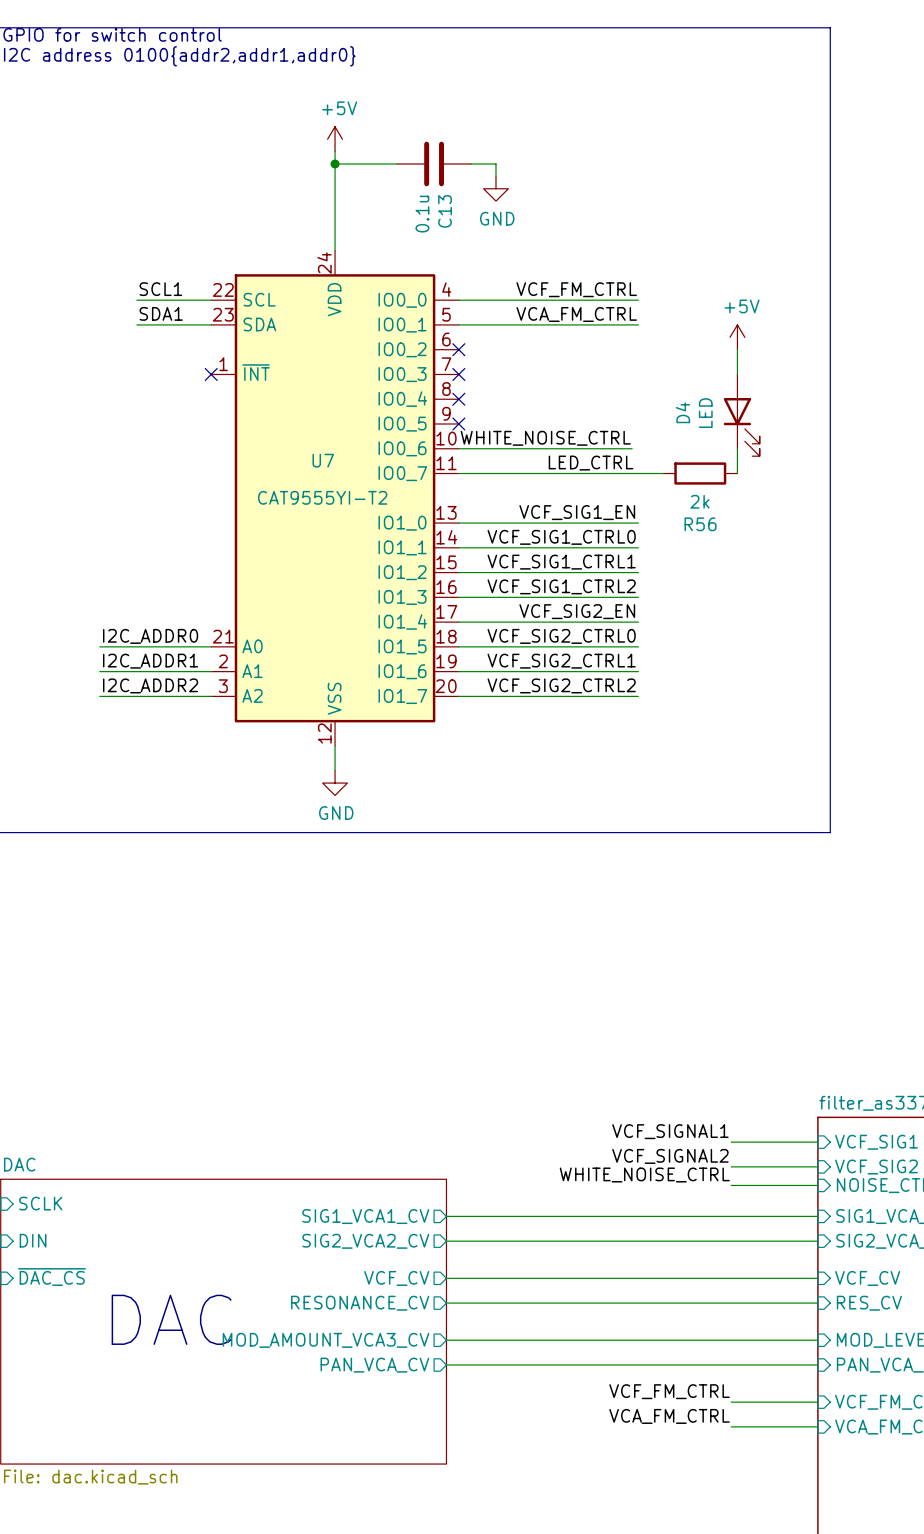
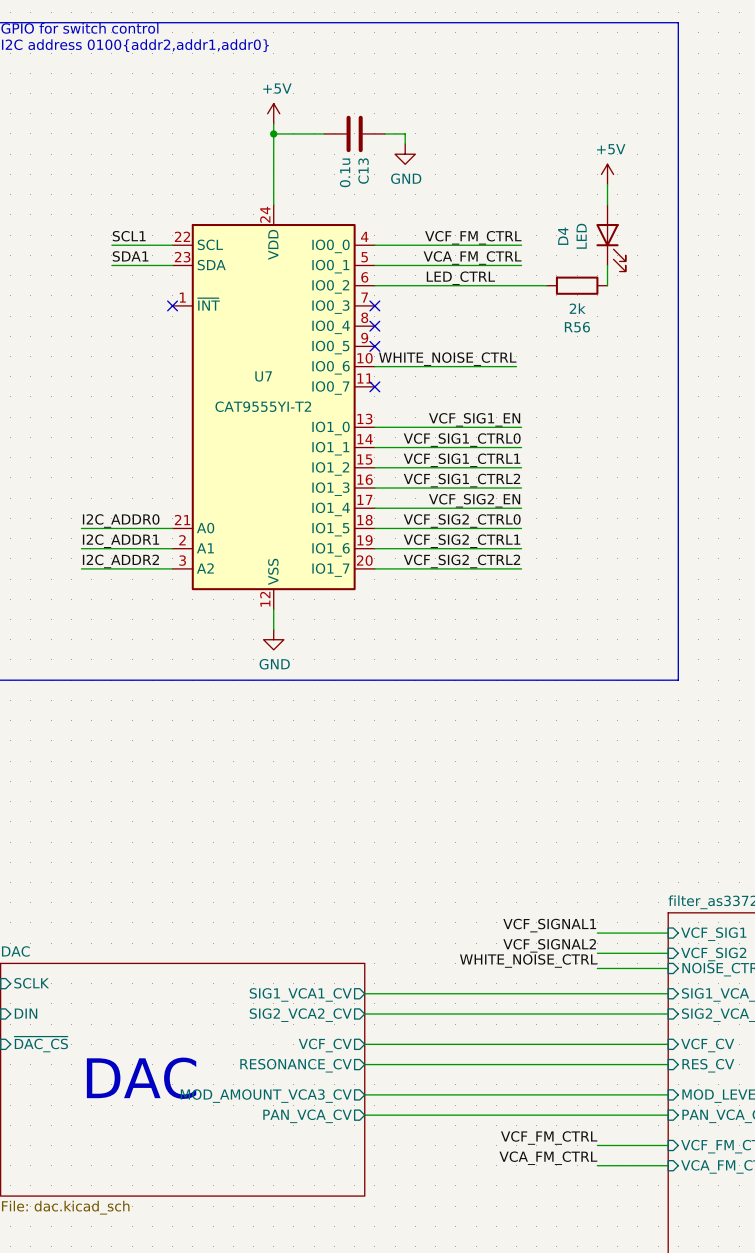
power symbol position: +5V (737, 337) -> +5V (607, 174)
wire: none -> (374, 285) (546, 285)
no-connect mark: (458, 349) -> none
wire: (737, 349) (737, 374) -> (607, 184) (607, 204)
D4 position: (741, 415) -> (611, 238)
wire: (737, 448) (737, 473) -> (607, 265) (607, 285)
label position: LED_CTRL (591, 463) -> LED_CTRL (460, 278)
wire: (458, 473) (663, 473) -> none
no-connect mark: none -> (374, 386)
R56 position: (700, 473) -> (577, 285)

